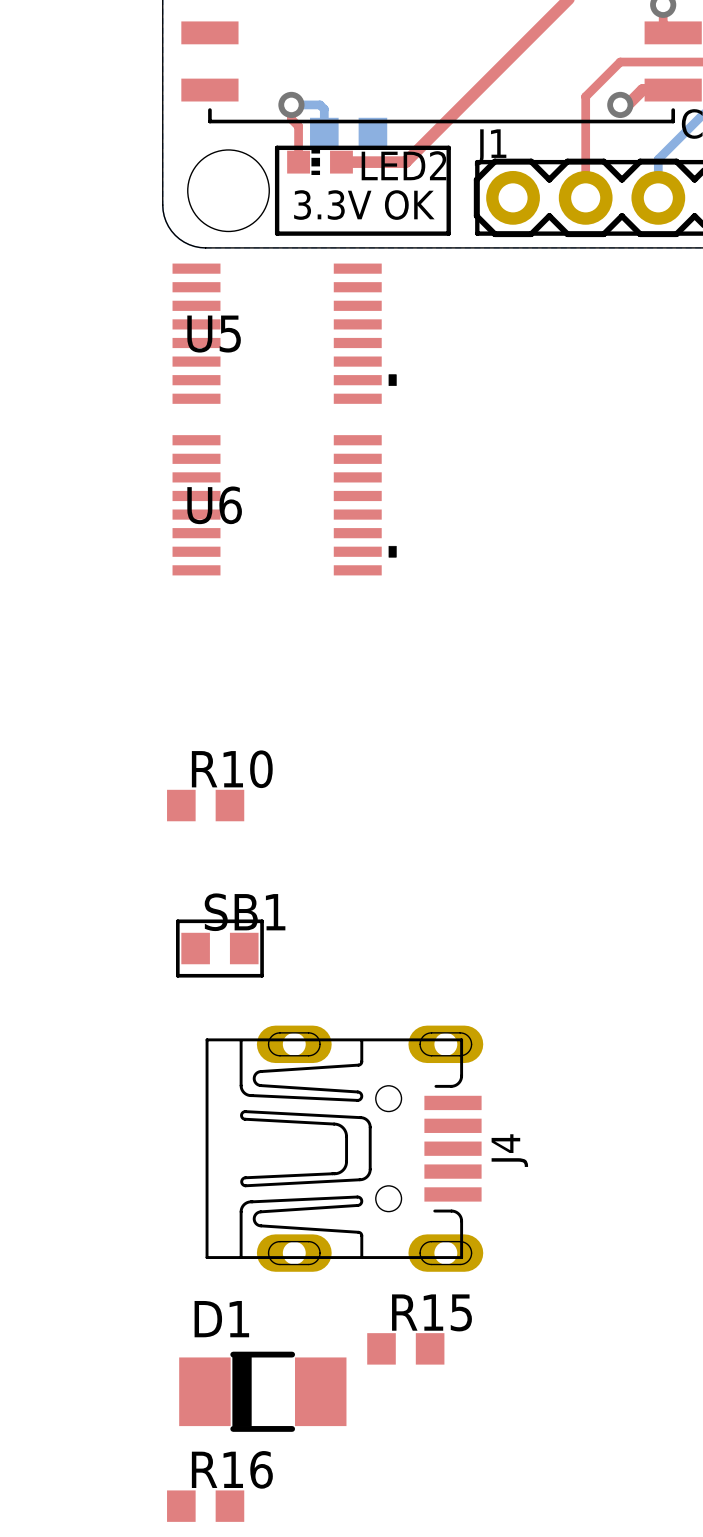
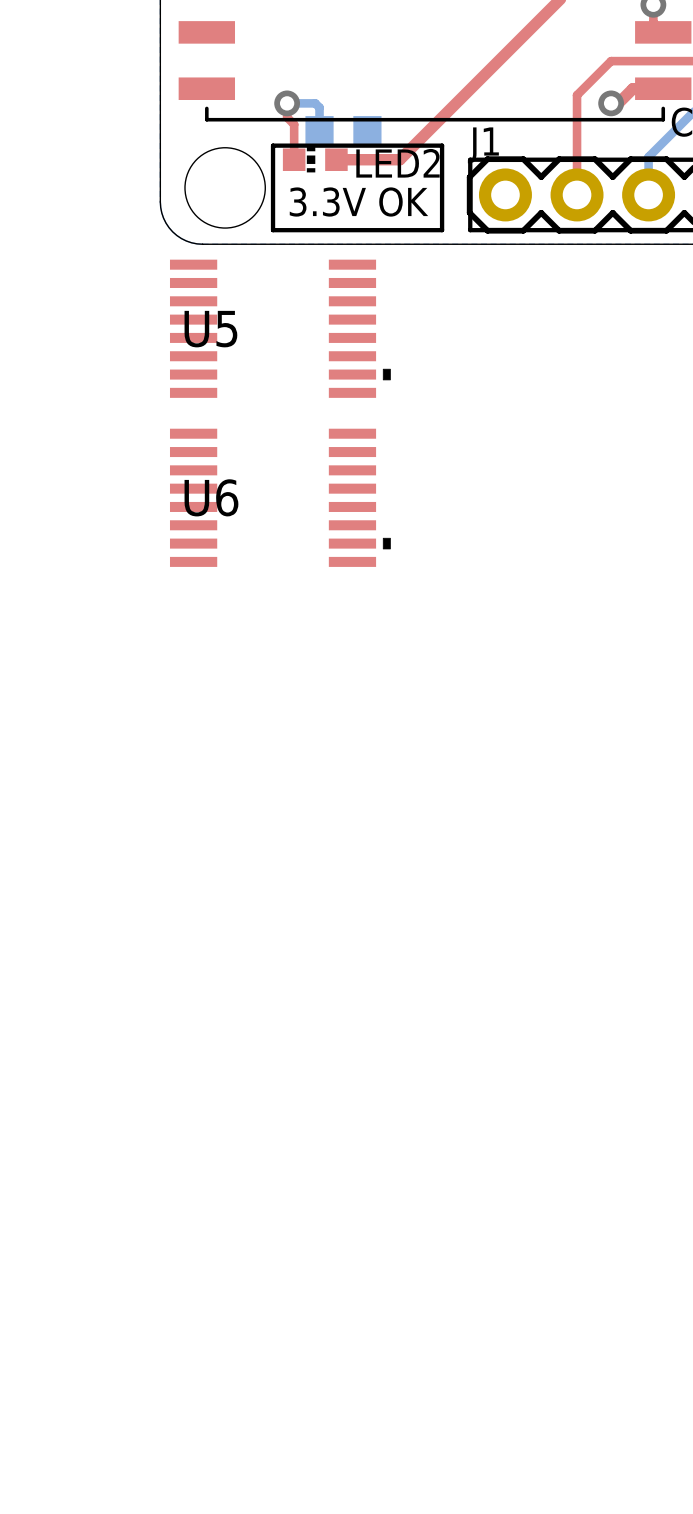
R10: (205, 805) -> none
SB1: (219, 948) -> none
J4: (344, 1148) -> none
R15: (405, 1348) -> none
D1: (262, 1391) -> none
R16: (205, 1506) -> none

